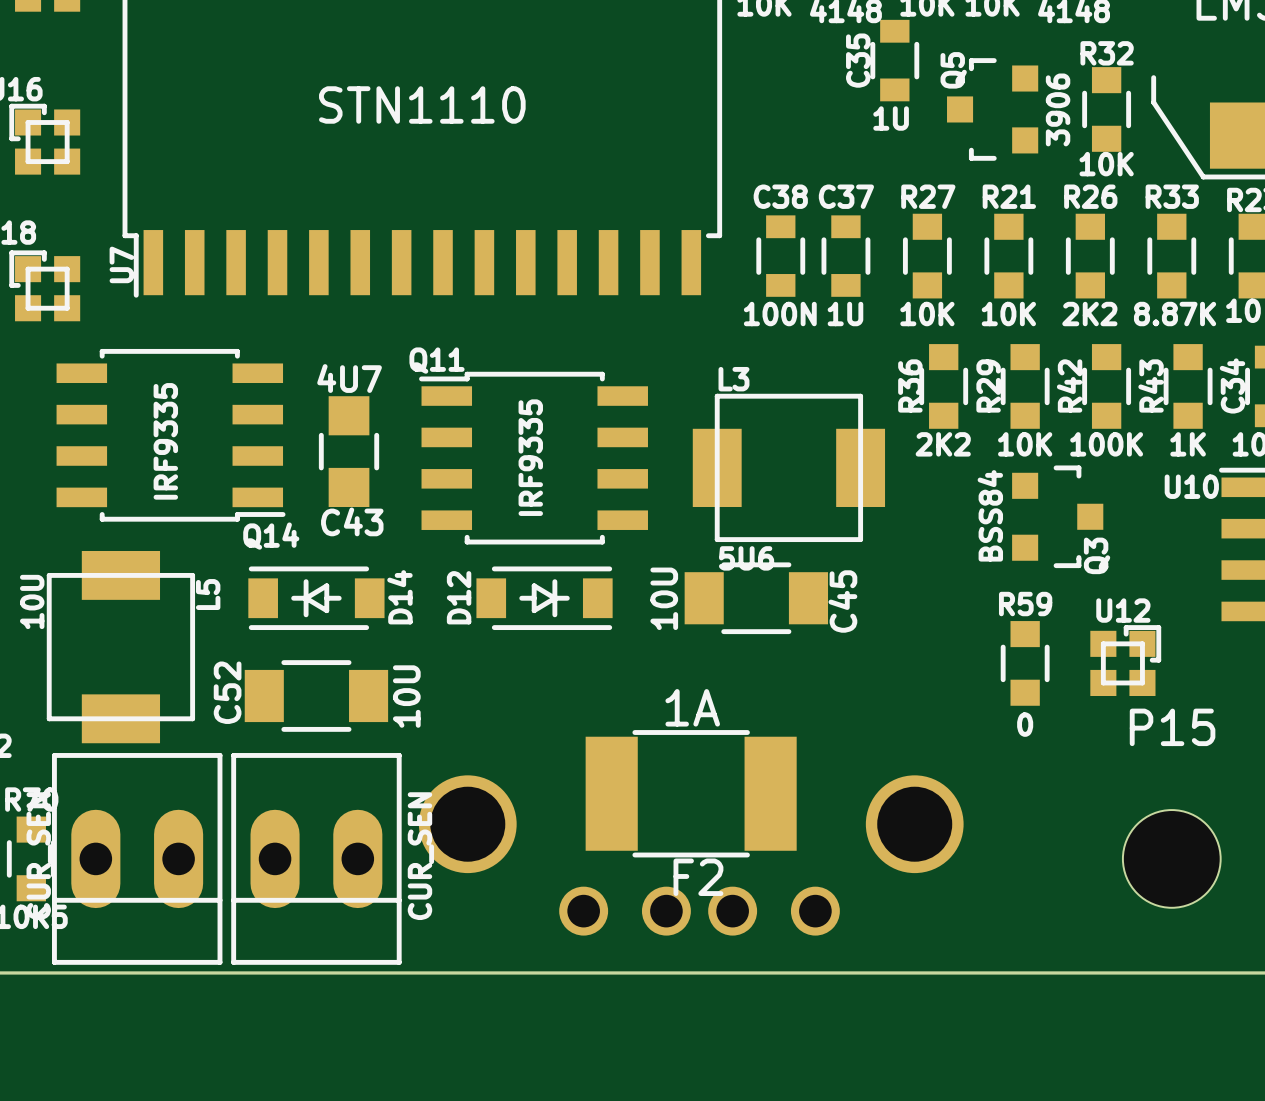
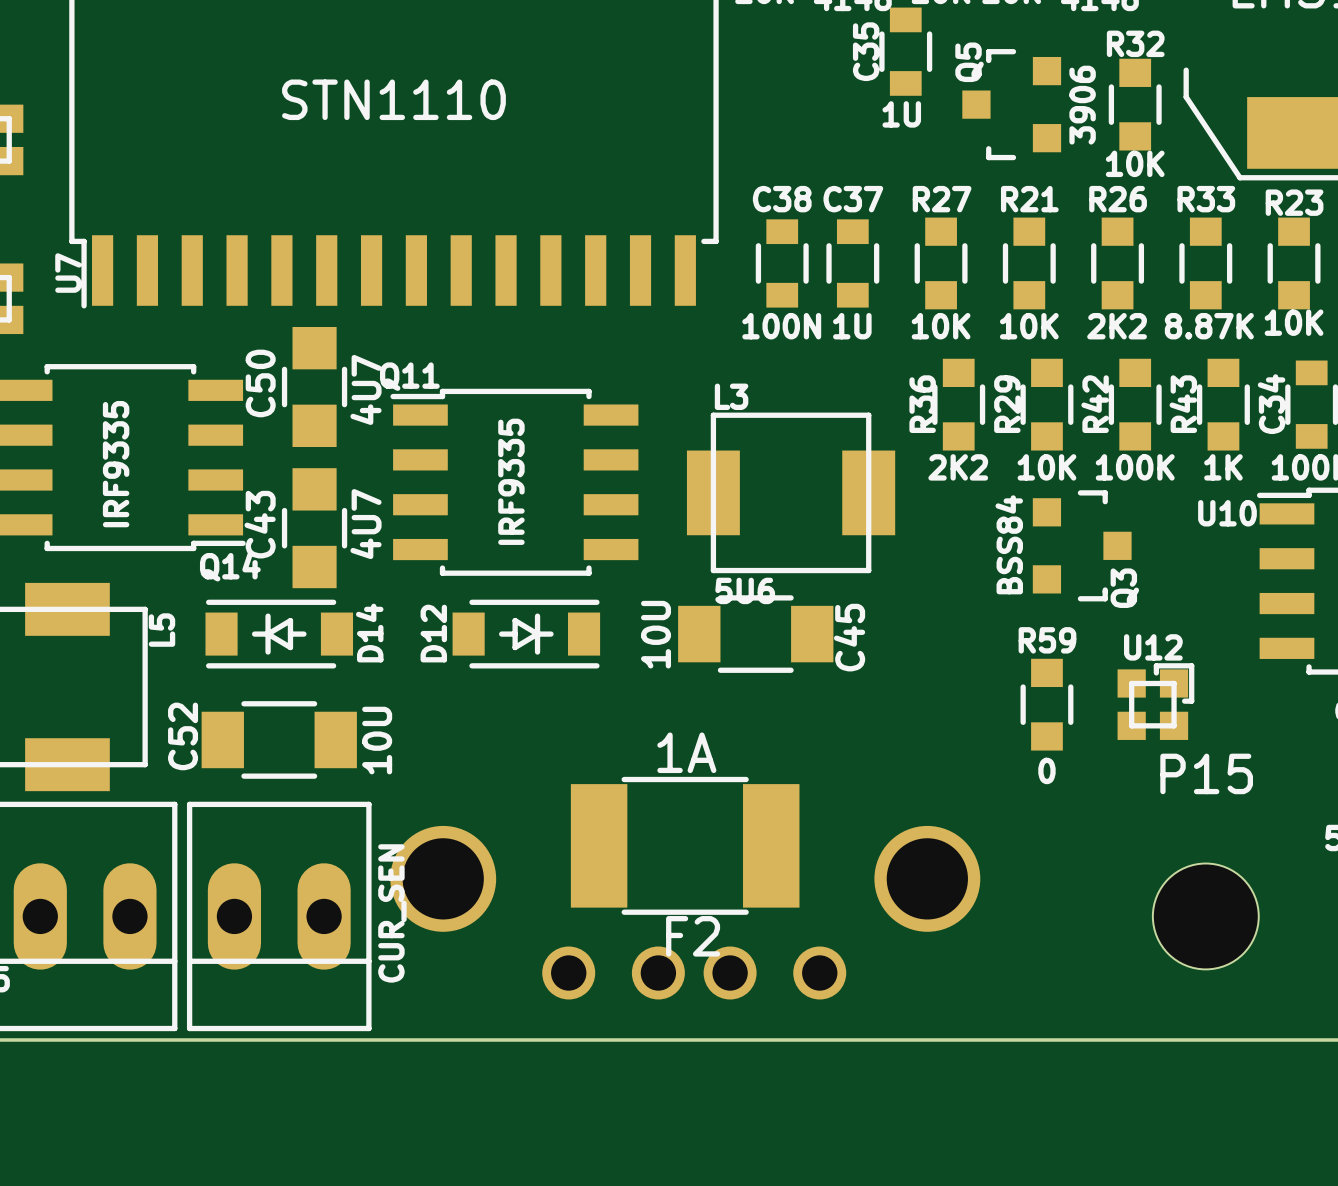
C50: none -> 4U7 (314, 387)
C43 value rotation: 0° (349, 378) -> 90° counterclockwise (365, 524)
C43 value position: 4U7 (349, 378) -> 4U7 (365, 524)
C43 position: (349, 451) -> (314, 528)
C43 name rotation: 0° (352, 521) -> 90° counterclockwise (260, 524)

